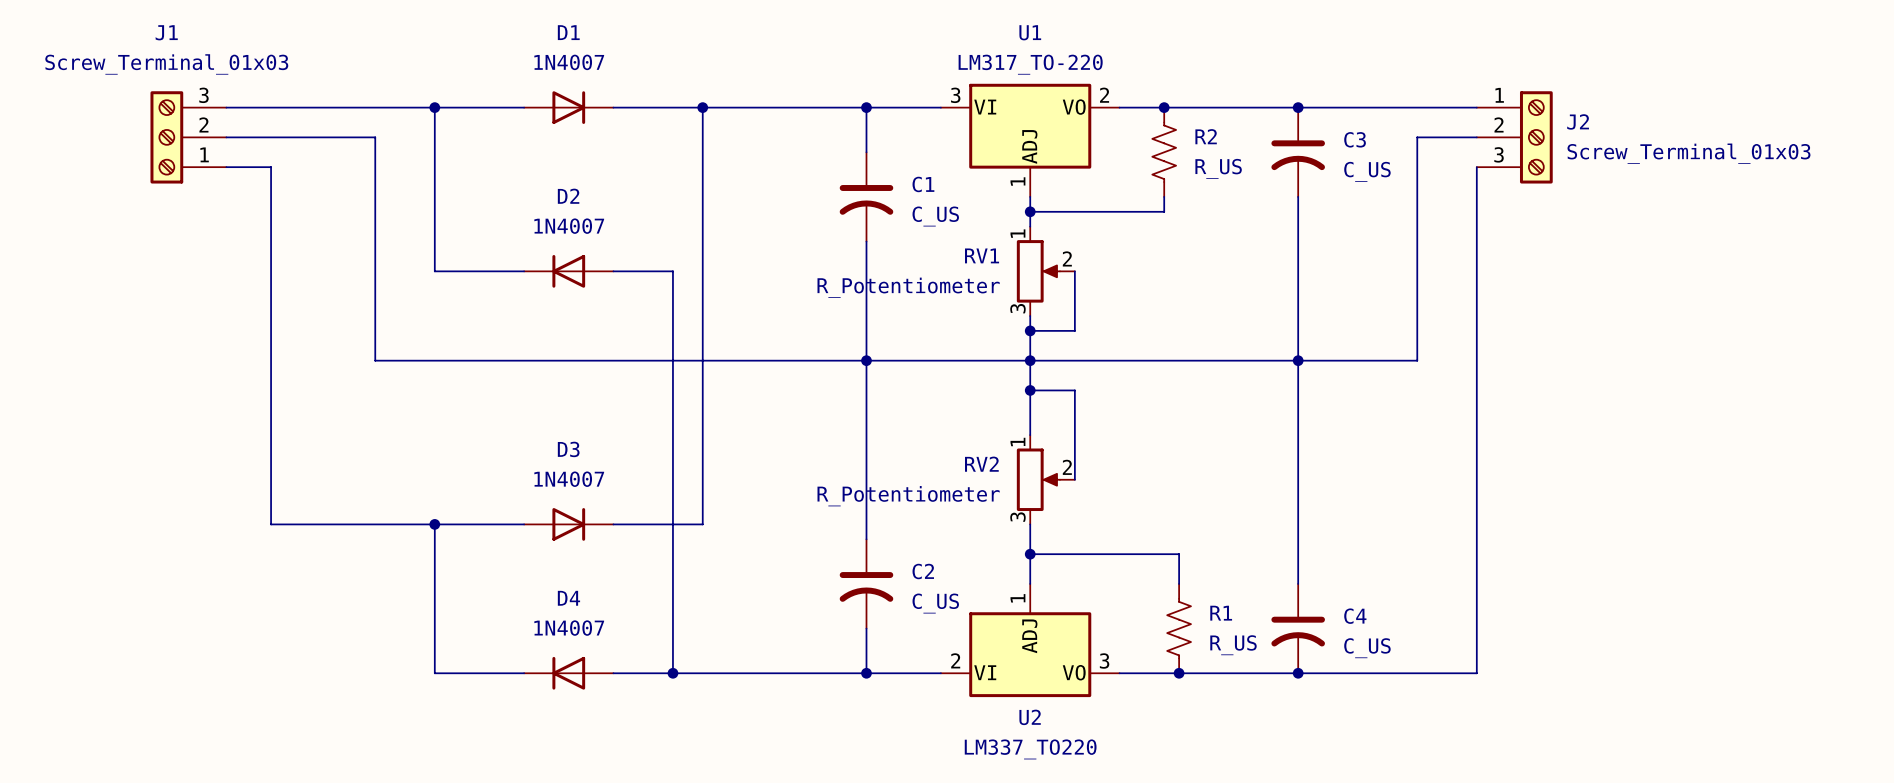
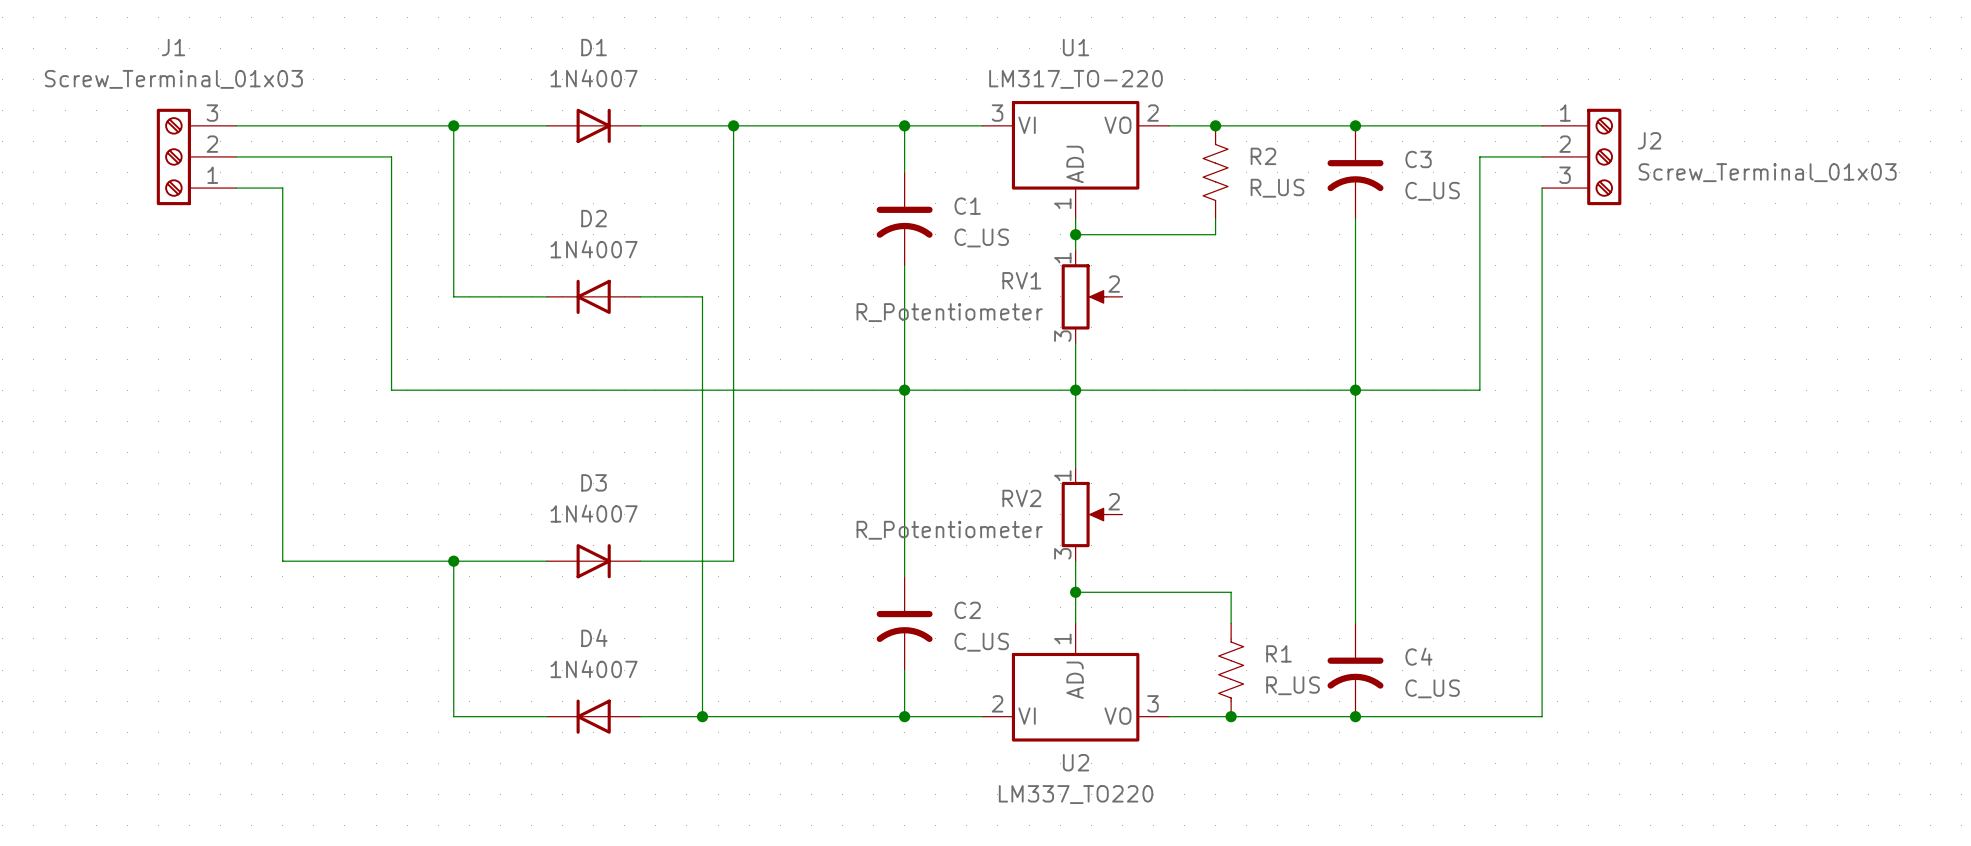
wire: (1074, 271) (1074, 330) (1030, 330) -> none
junction: (1030, 330) -> none
wire: (1030, 390) (1074, 390) (1074, 479) -> none
junction: (1030, 390) -> none

